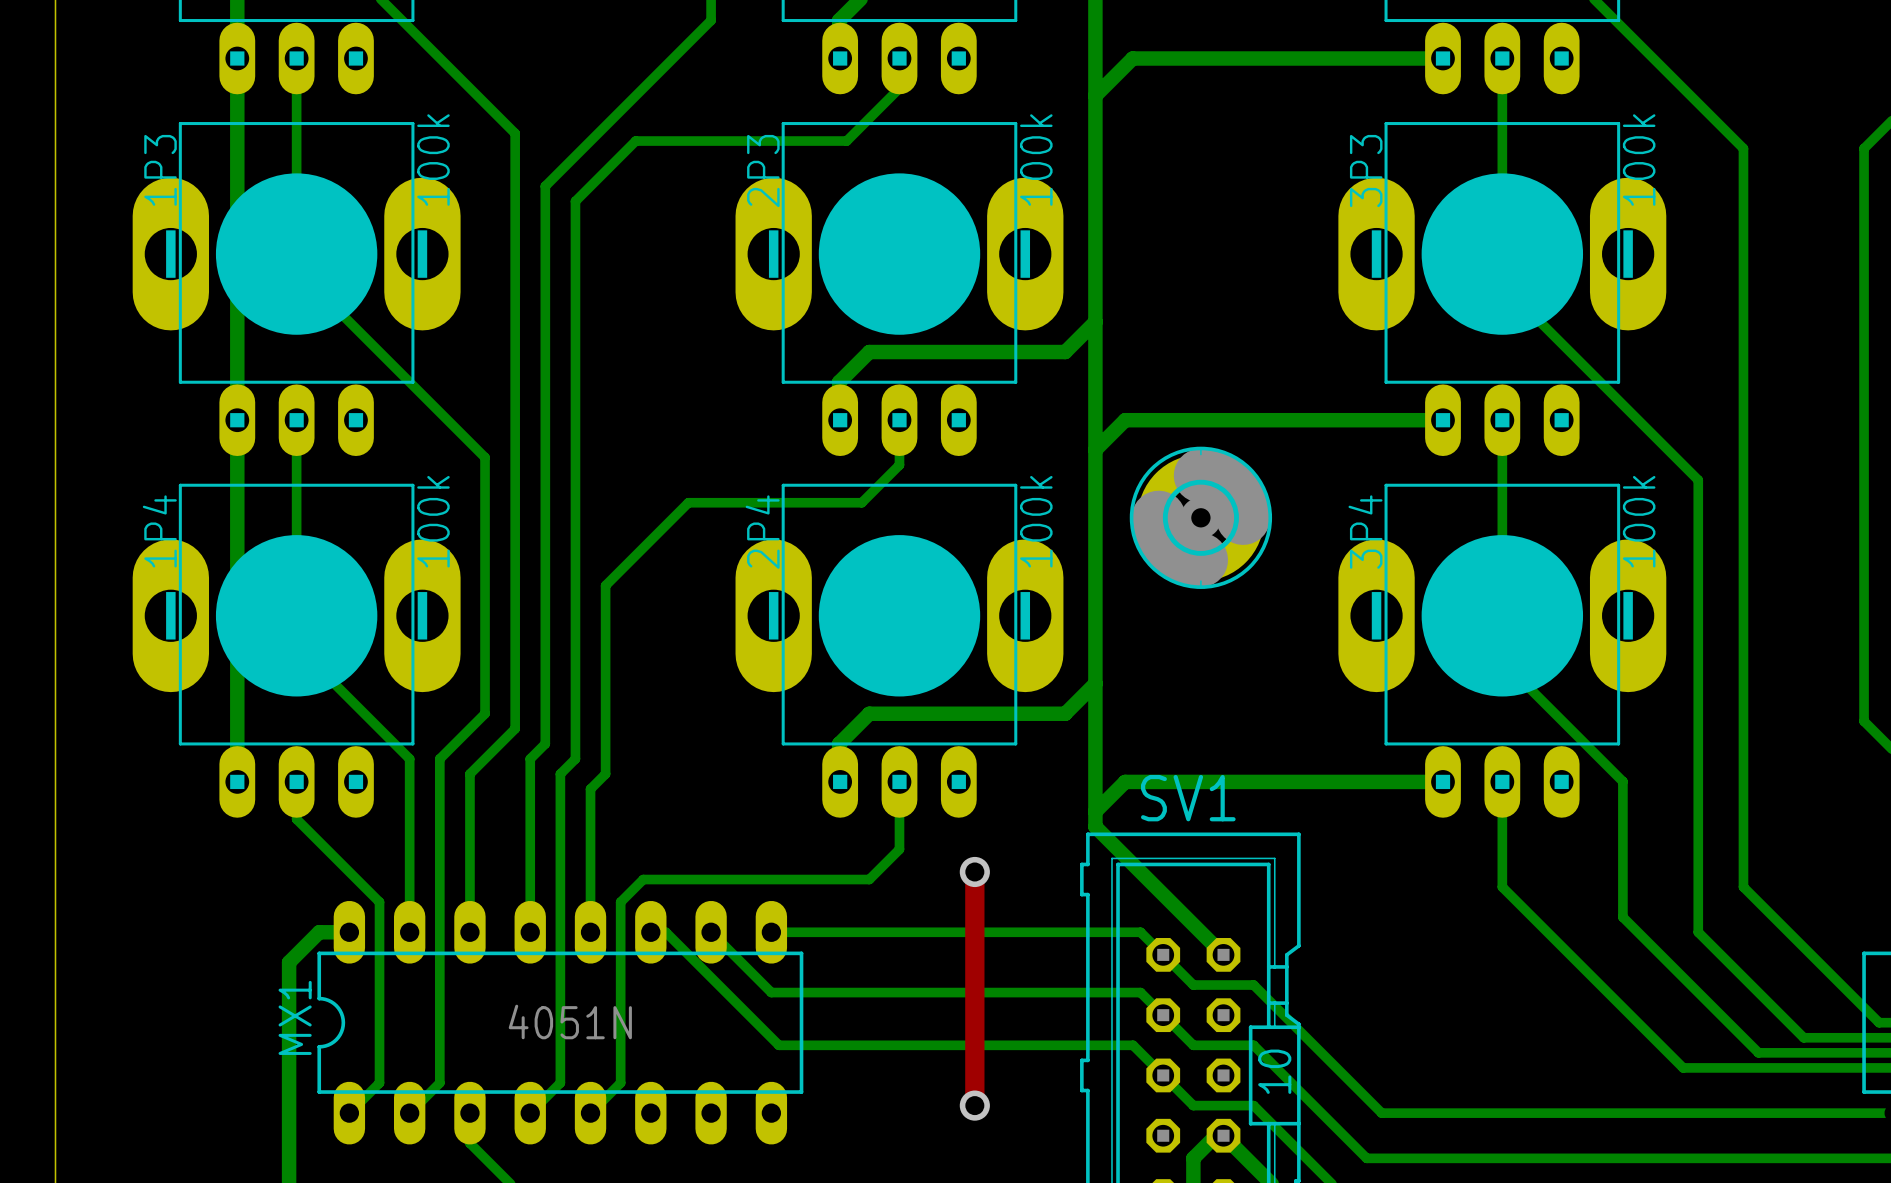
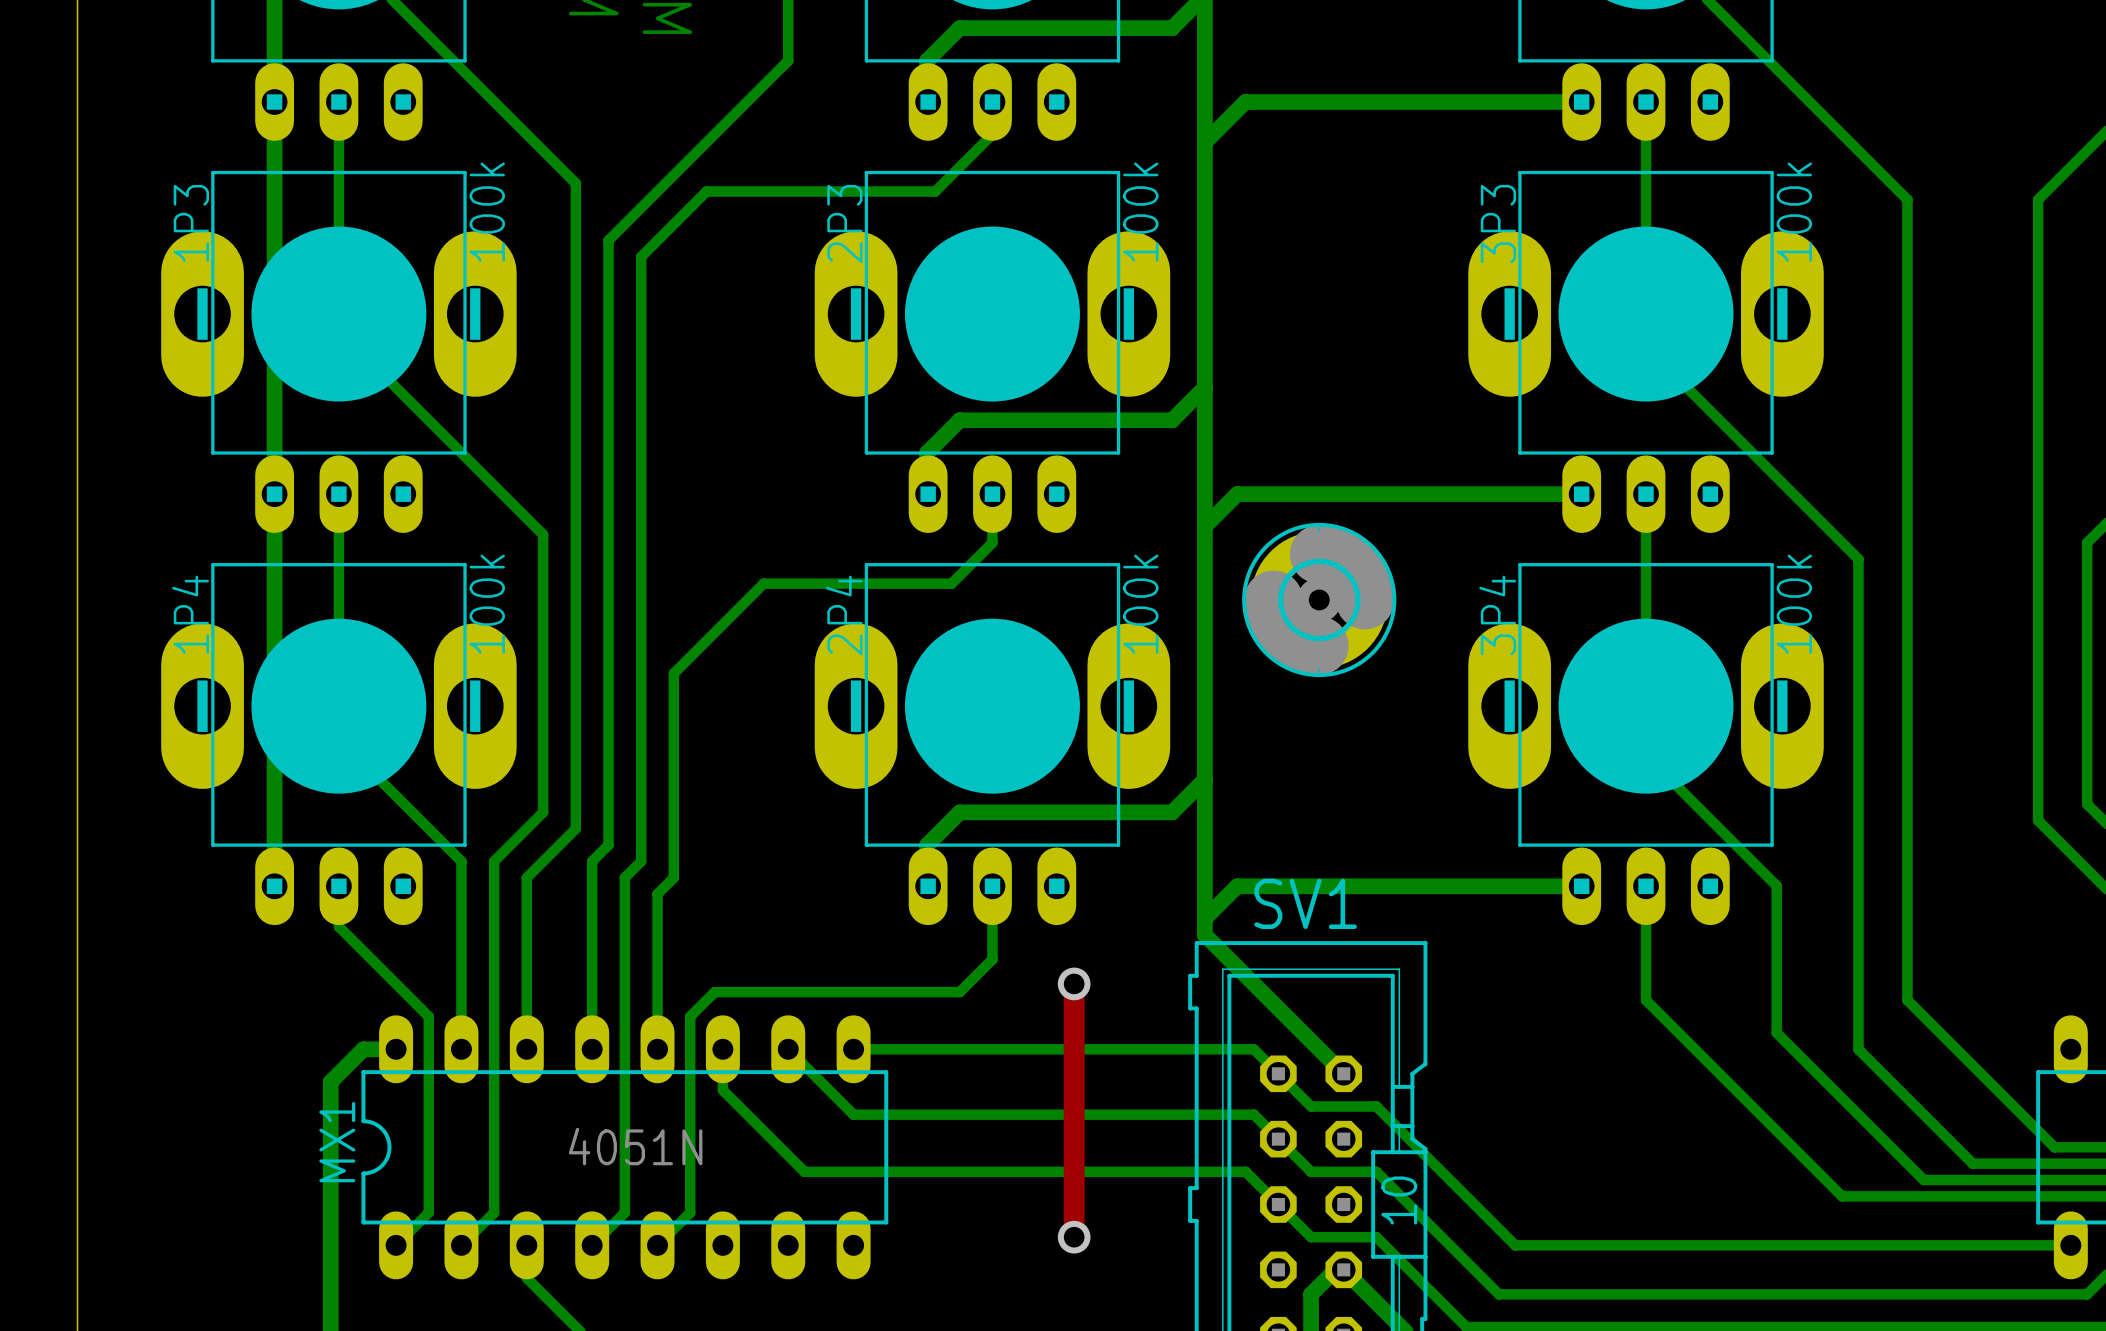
bottom track: (650, 932) (665, 932) (778, 1045) -> (722, 1049) (722, 1090) (804, 1171) (861, 1171)

